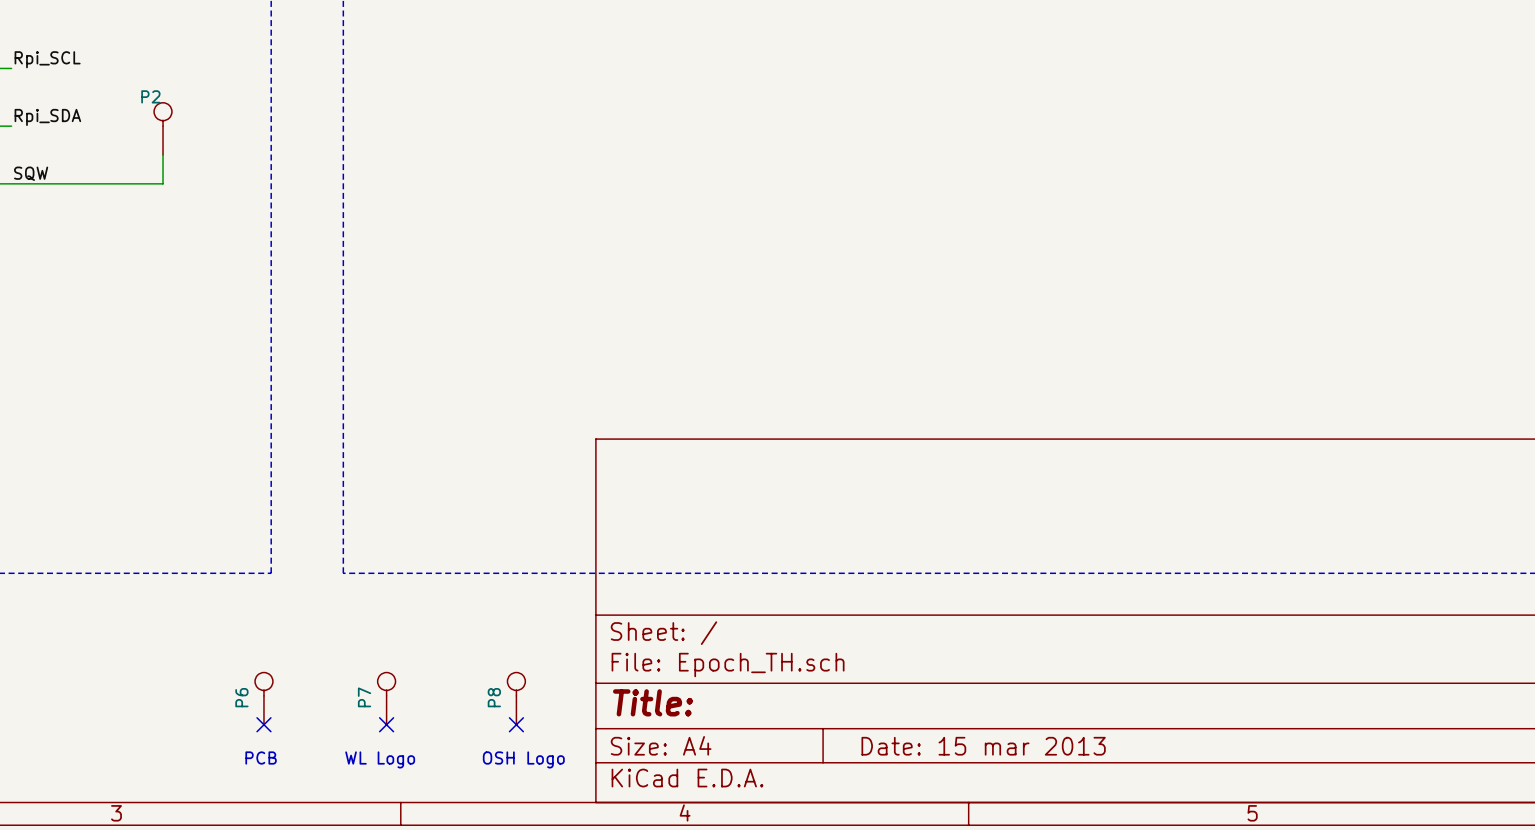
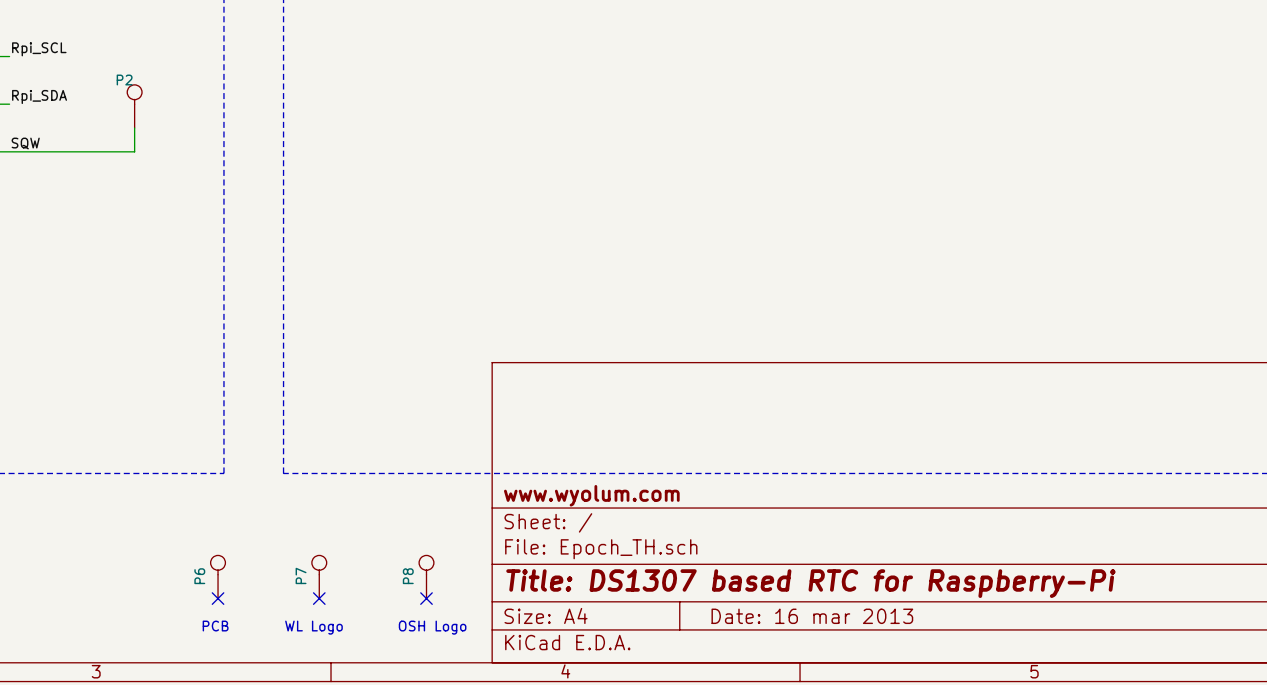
title block: none -> www.wyolum.com (591, 495)
title block: Title: (653, 702) -> Title: DS1307 based RTC for Raspberry-Pi (810, 583)
title block: Date: 15 mar 2013 (983, 746) -> Date: 16 mar 2013 (812, 616)

